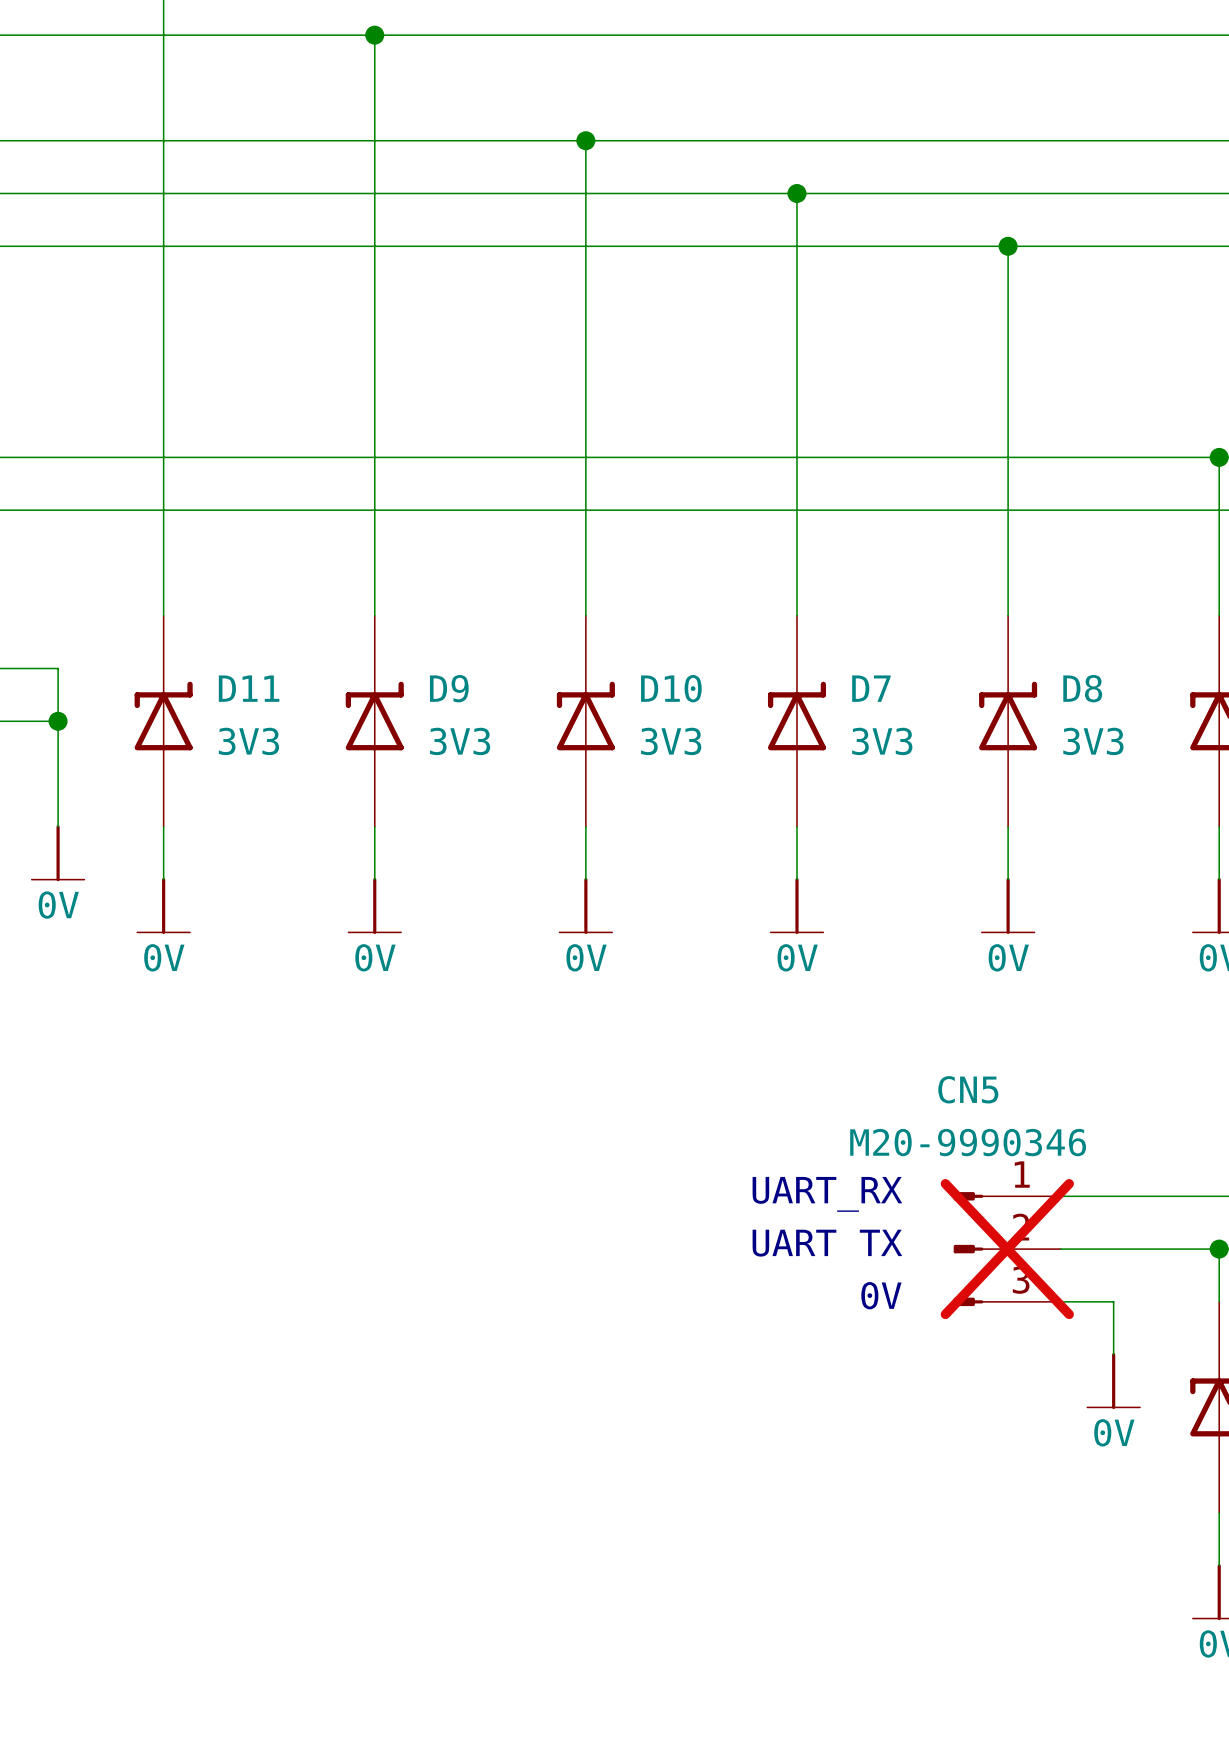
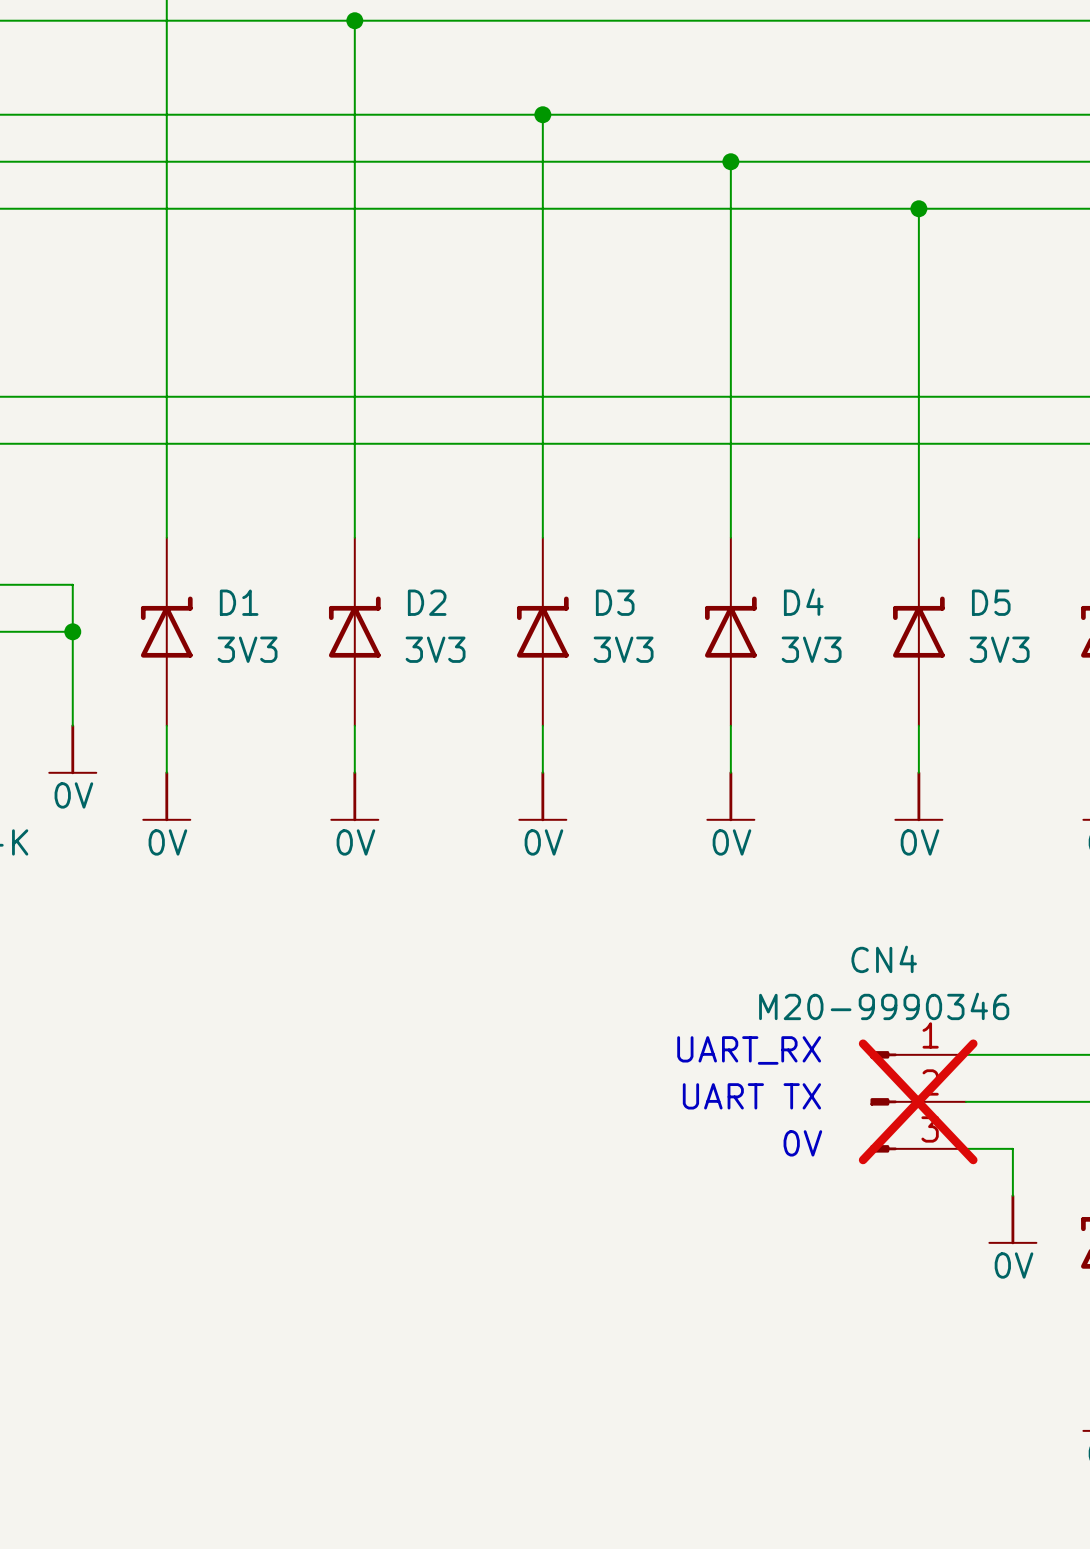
D11 name: D11 (249, 688) -> D1 (239, 602)
D9 name: D9 (449, 688) -> D2 (427, 602)
D10 name: D10 (671, 688) -> D3 (615, 602)
D7 name: D7 (871, 688) -> D4 (803, 602)
D8 name: D8 (1082, 688) -> D5 (991, 602)
CN5 name: CN5 (968, 1089) -> CN4 (884, 959)

